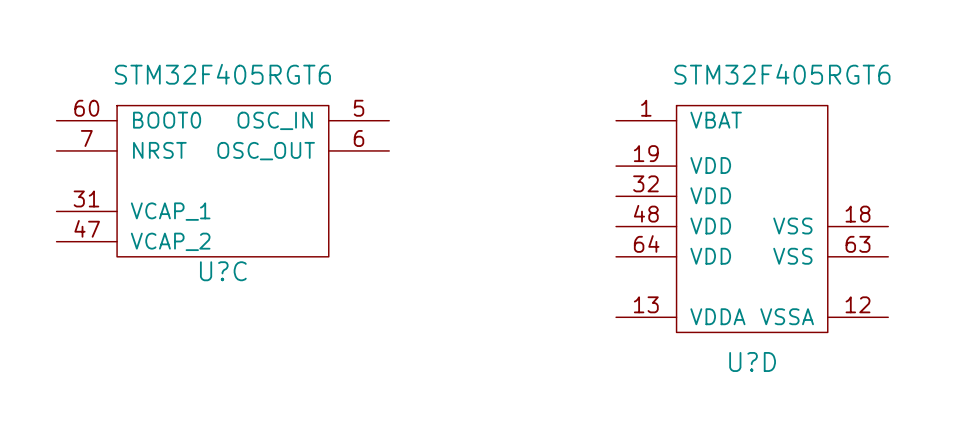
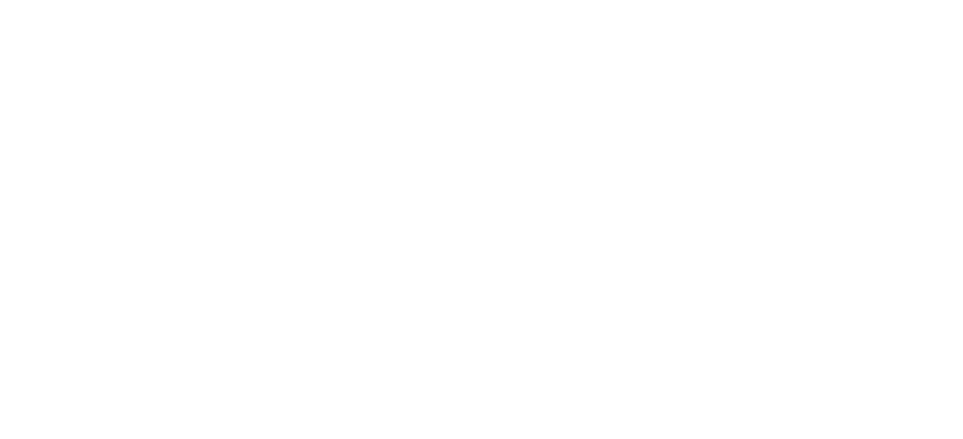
U?C: STM32F405RGT6 (222, 181) -> none
U?D: STM32F405RGT6 (752, 219) -> none

